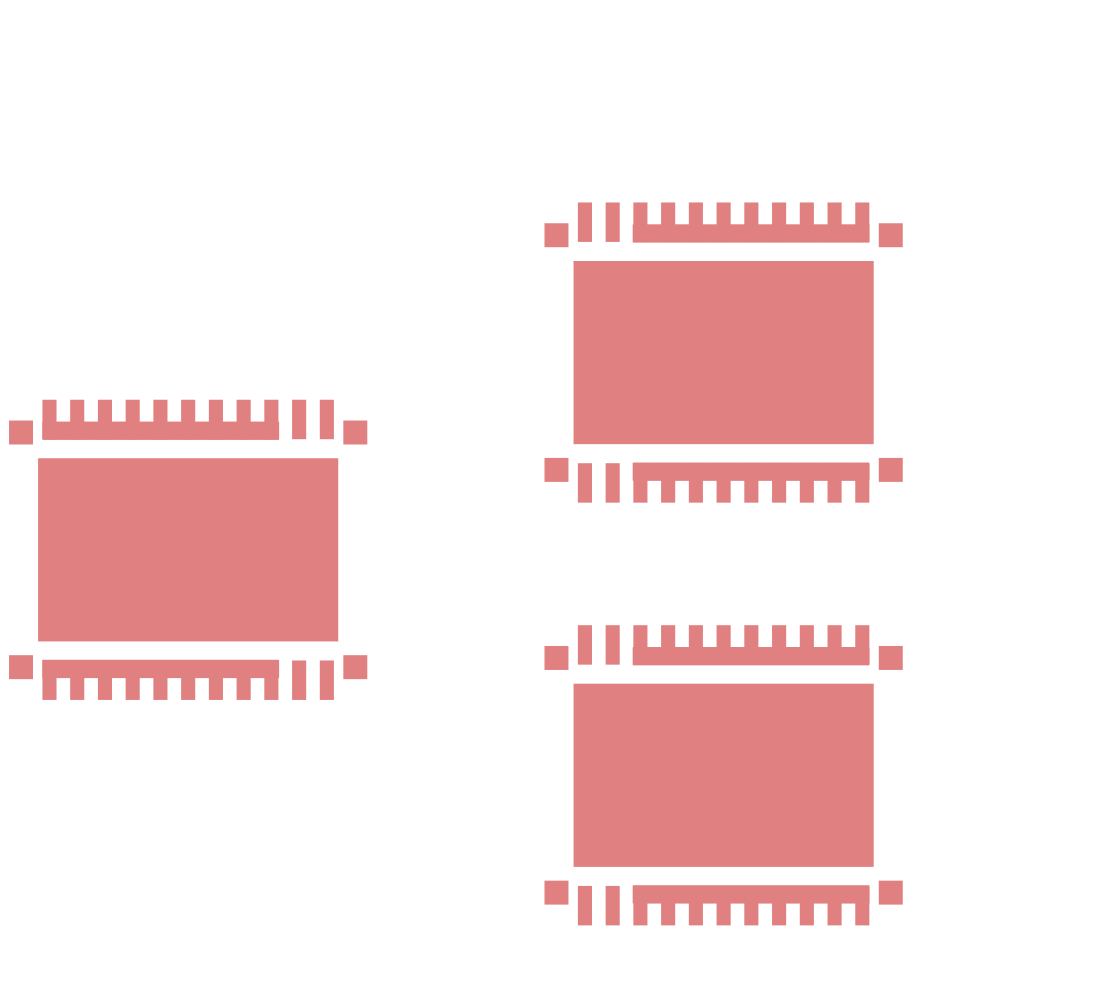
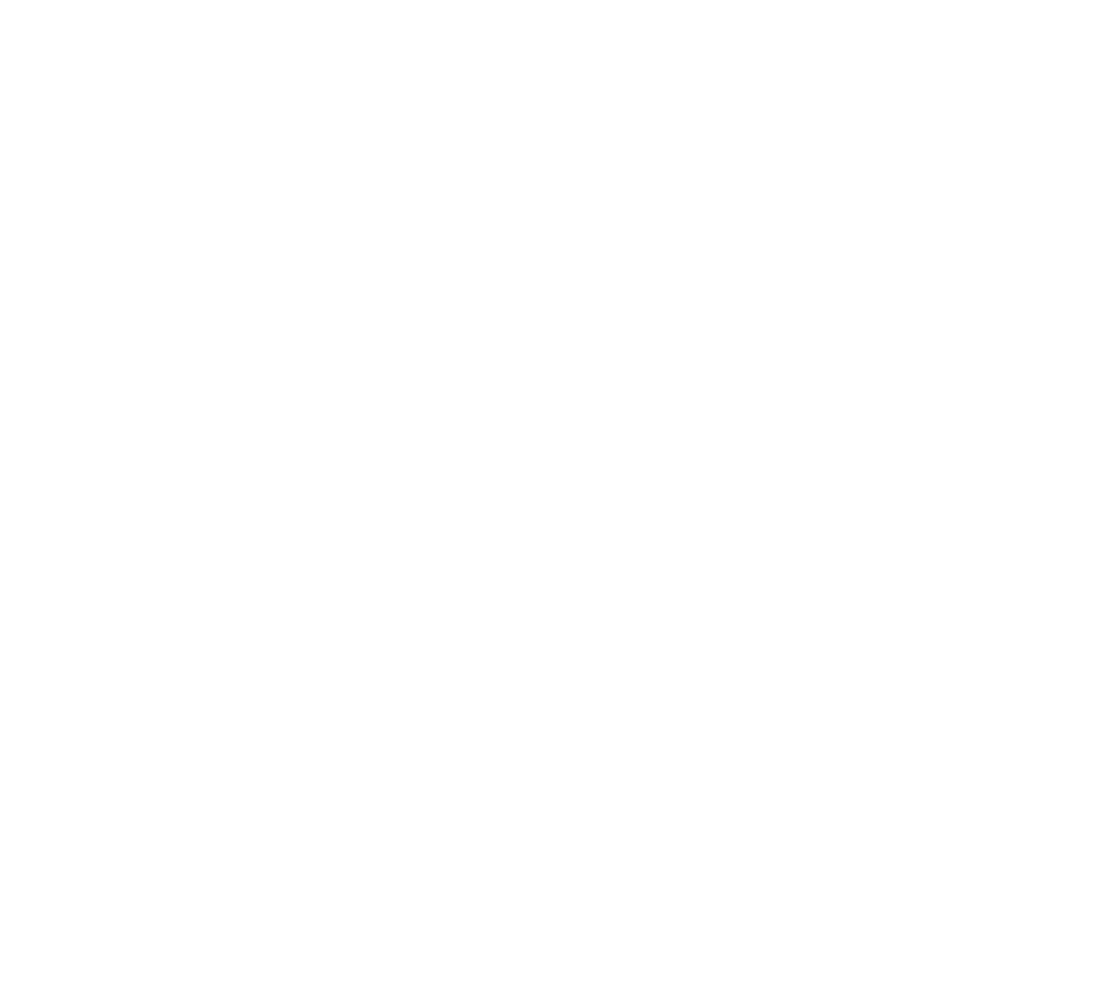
part: (723, 352) -> none
part: (188, 549) -> none
part: (723, 775) -> none

